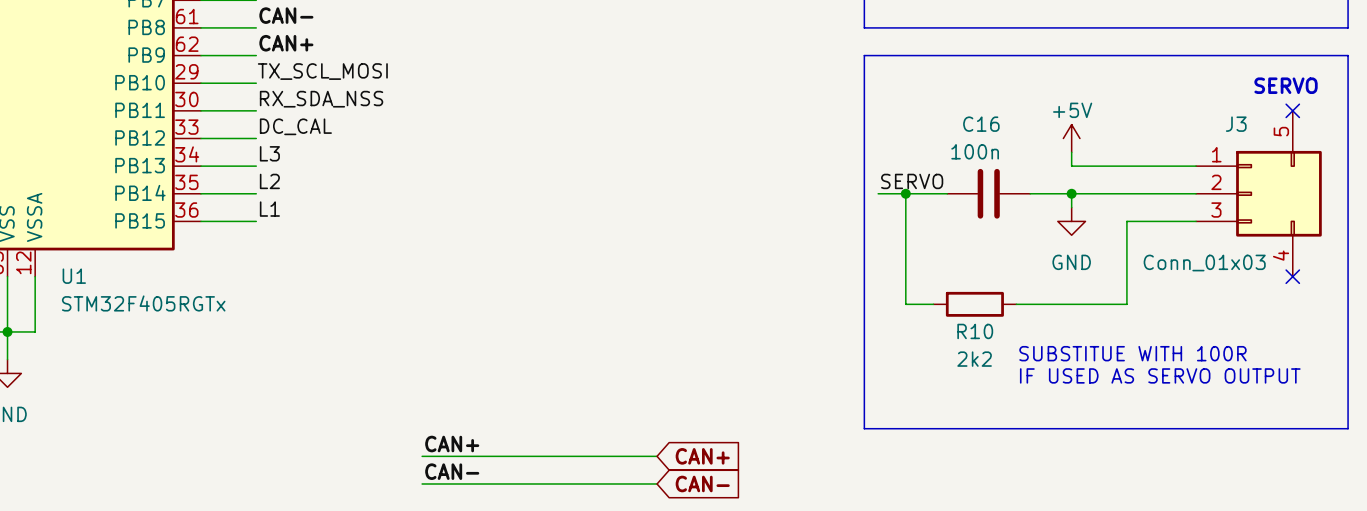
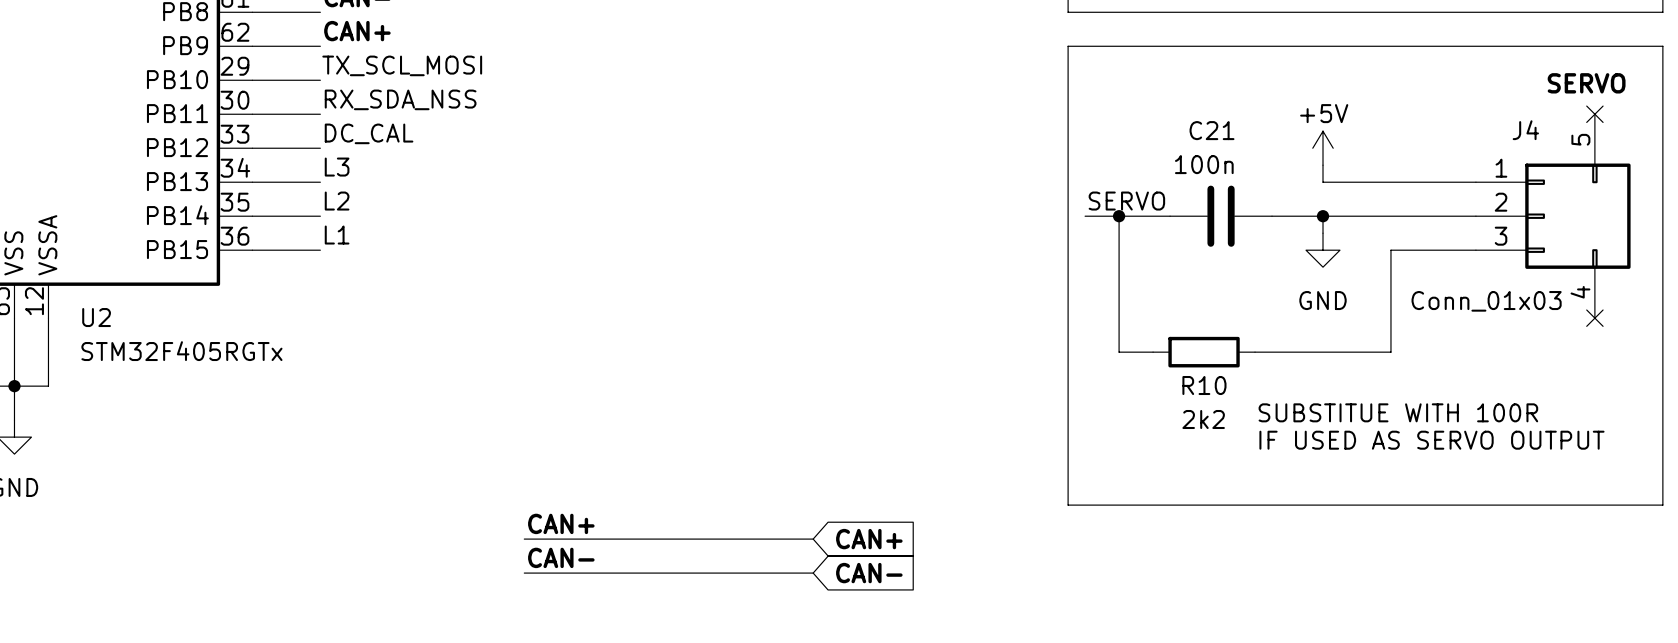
C16 name: C16 (981, 124) -> C21 (1212, 130)
J3 name: J3 (1236, 124) -> J4 (1525, 130)
U1 name: U1 (74, 276) -> U2 (96, 317)

